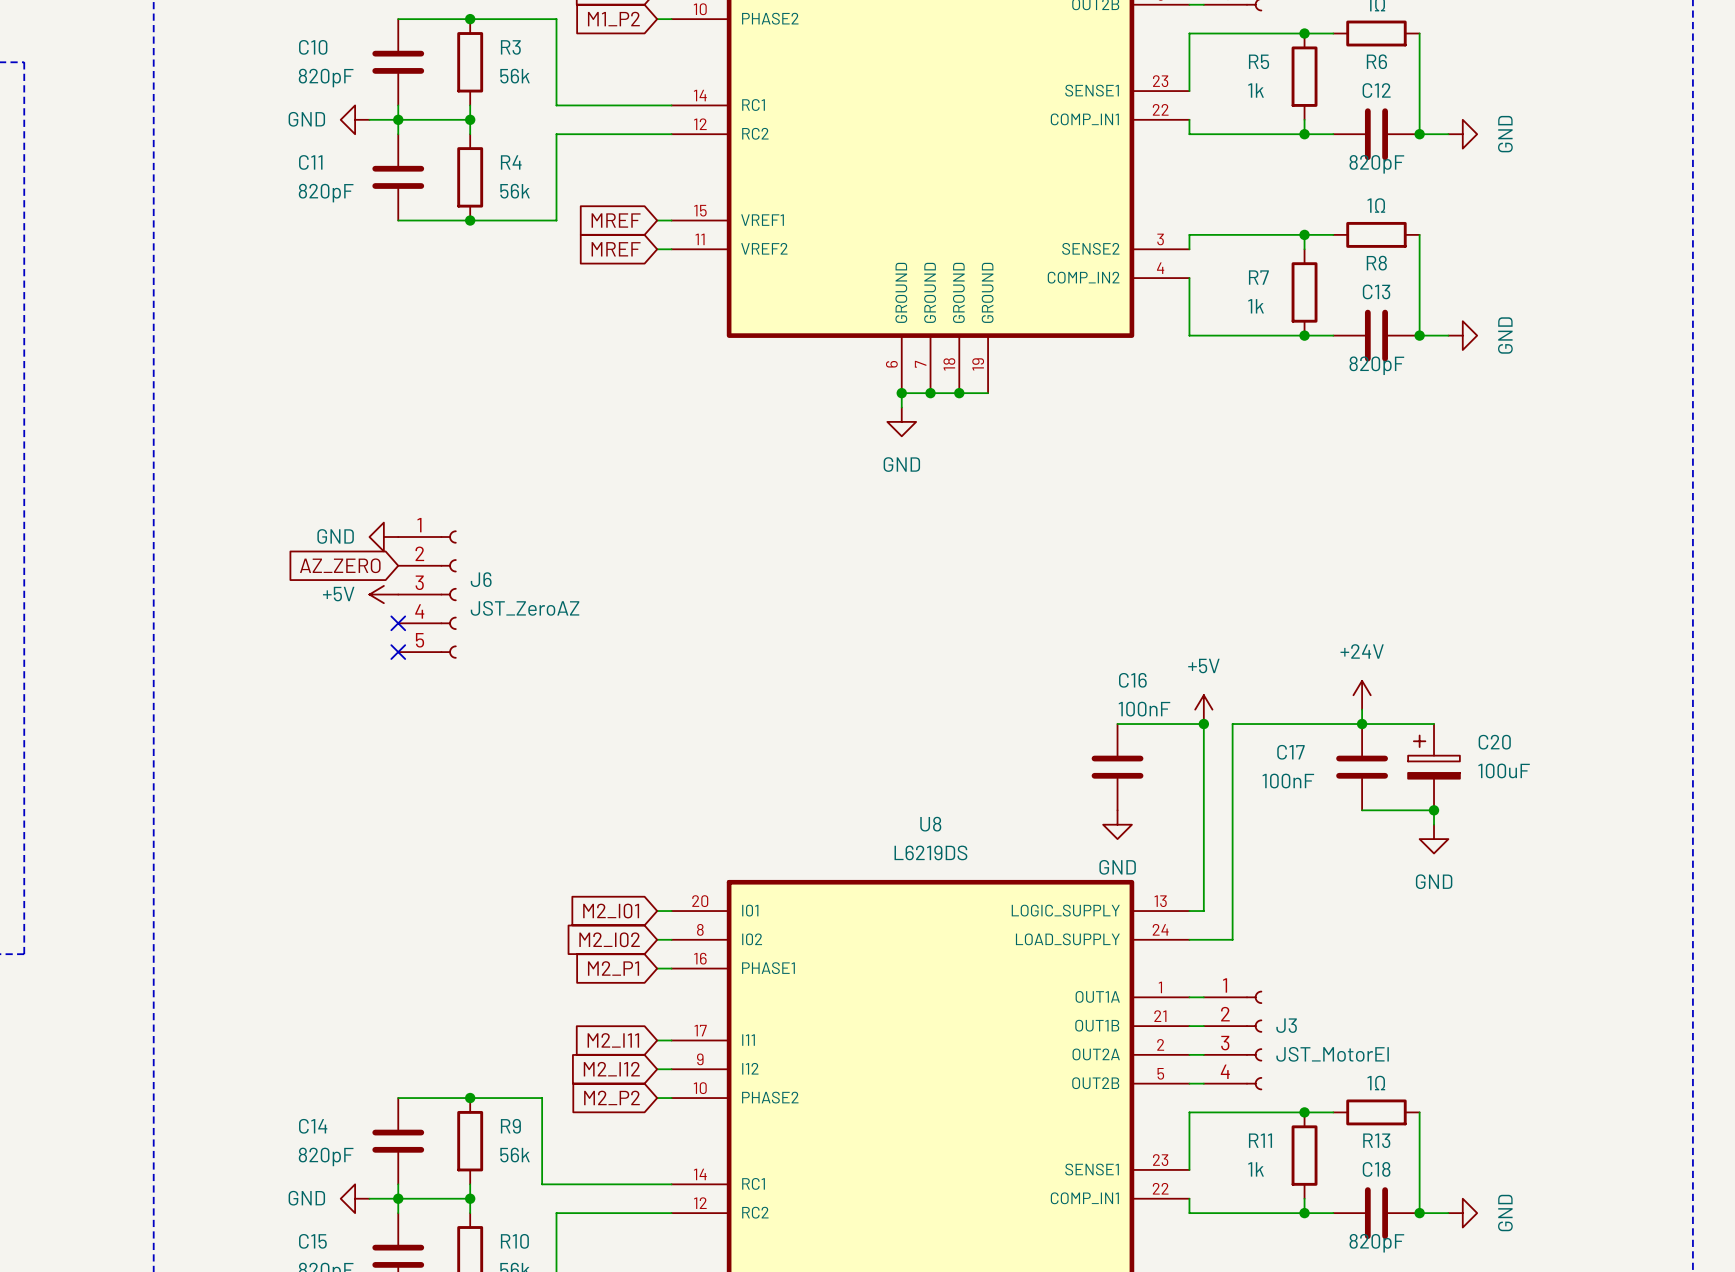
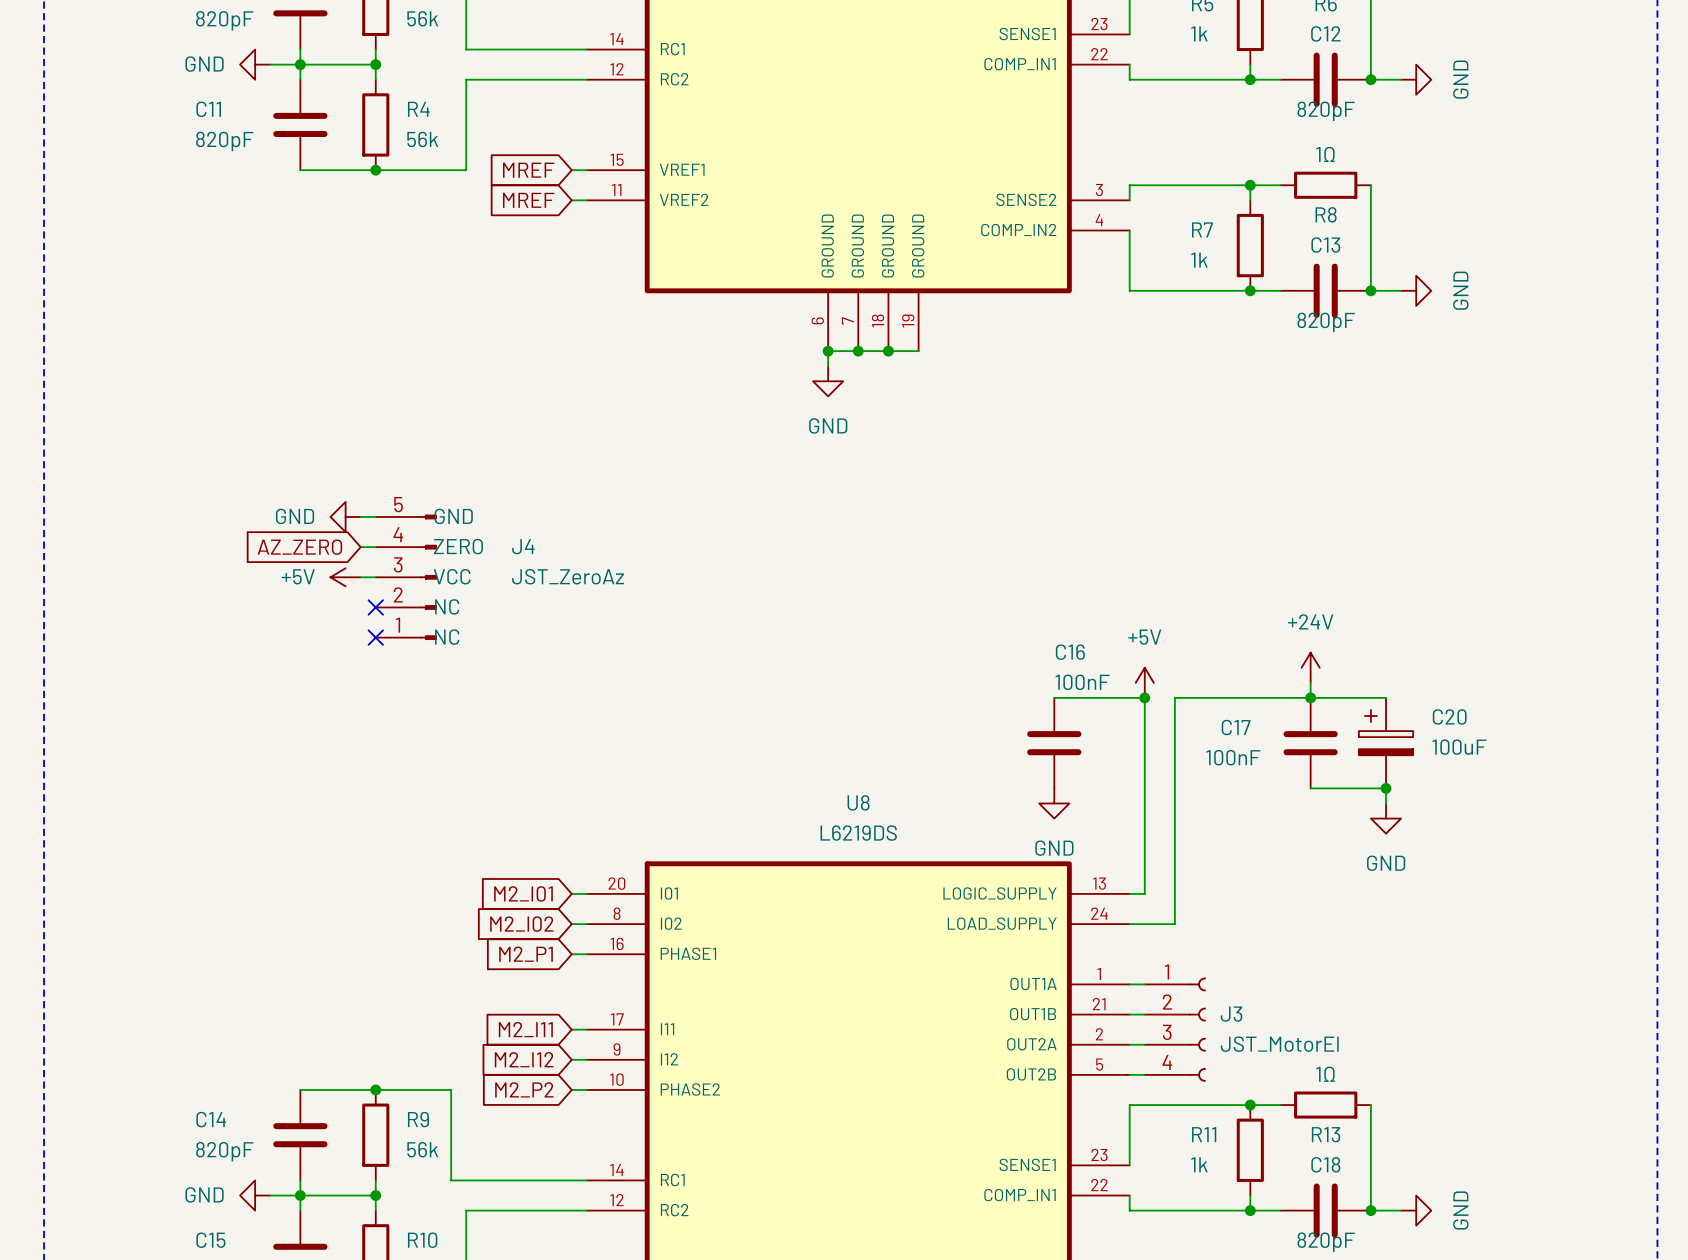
power symbol position: GND (383, 537) -> GND (345, 516)
wire: none -> (360, 516) (375, 516)
global label position: AZ_ZERO (340, 565) -> AZ_ZERO (299, 547)
wire: none -> (360, 547) (375, 547)
power symbol position: +5V (383, 594) -> +5V (345, 577)
J6: JST_ZeroAZ (427, 594) -> none
wire: none -> (360, 577) (375, 577)
J4: none -> JST_ZeroAz (406, 577)
no-connect mark: (398, 623) -> none
no-connect mark: none -> (375, 607)
no-connect mark: (398, 652) -> none
no-connect mark: none -> (375, 637)

